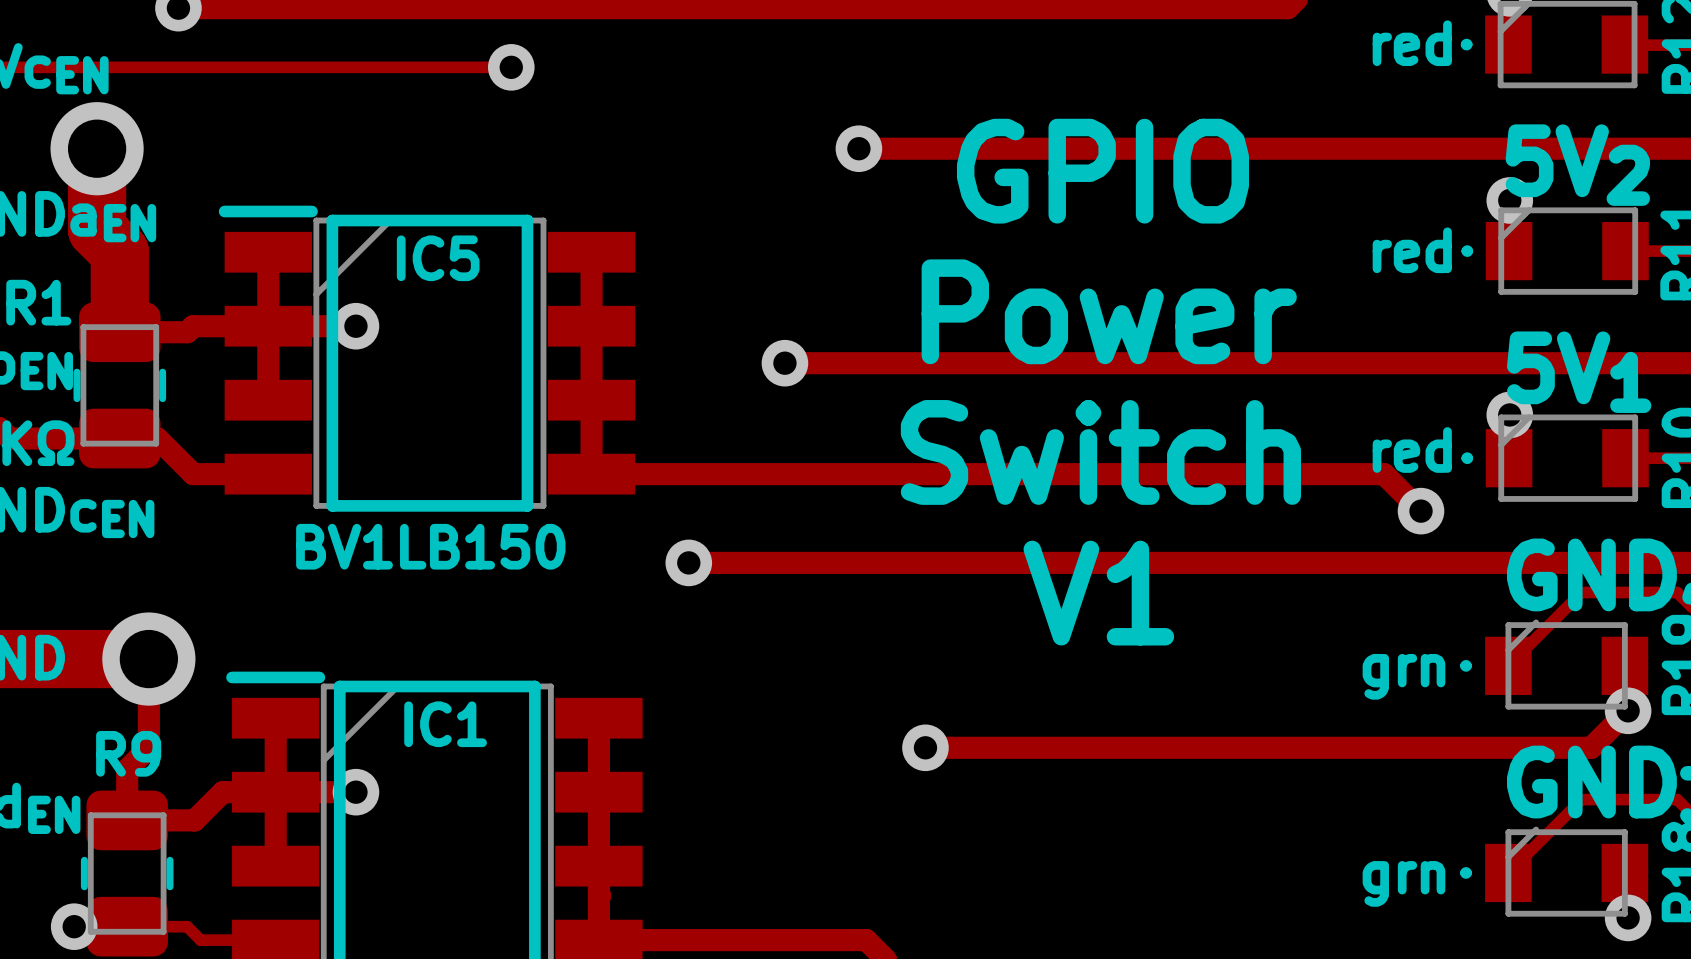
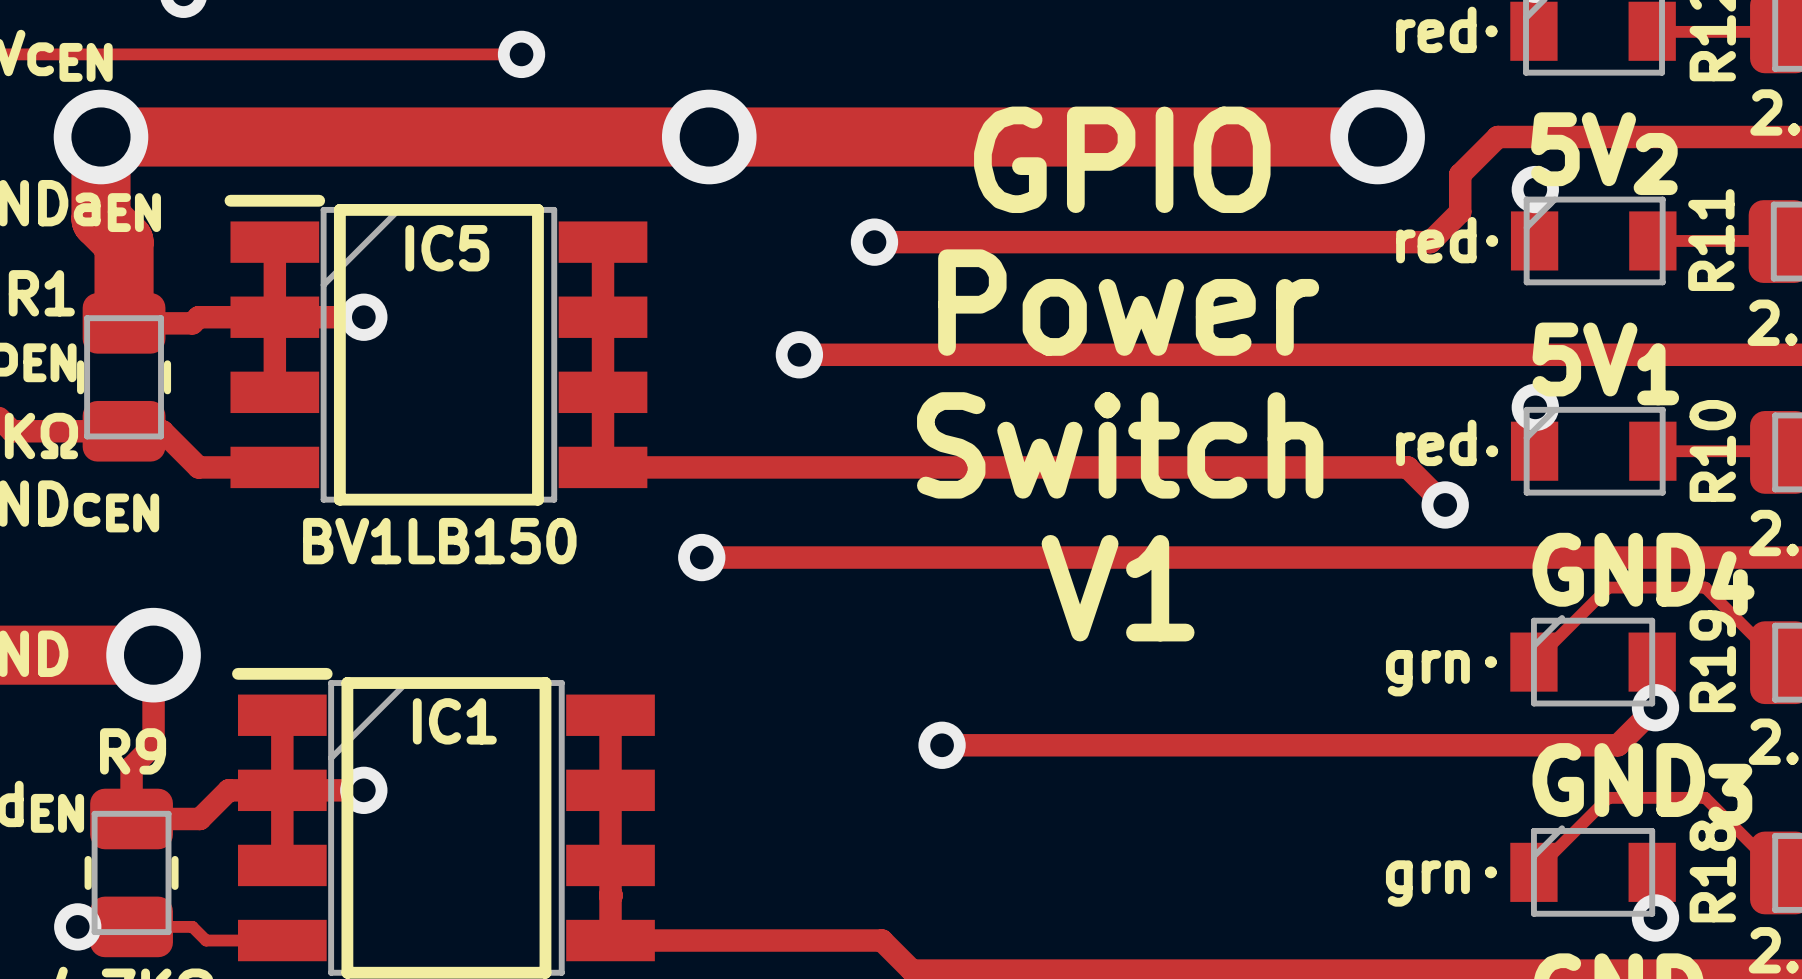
track: none -> (100, 137) (874, 137)
via: none -> (709, 137)
track width: thin (858, 148) (1354, 148) -> thick (874, 137) (1377, 137)
via position: (858, 148) -> (874, 242)
track: (1354, 148) (1472, 148) -> (874, 242) (1430, 242) (1460, 212) (1460, 174) (1497, 137)
via: none -> (1377, 137)

